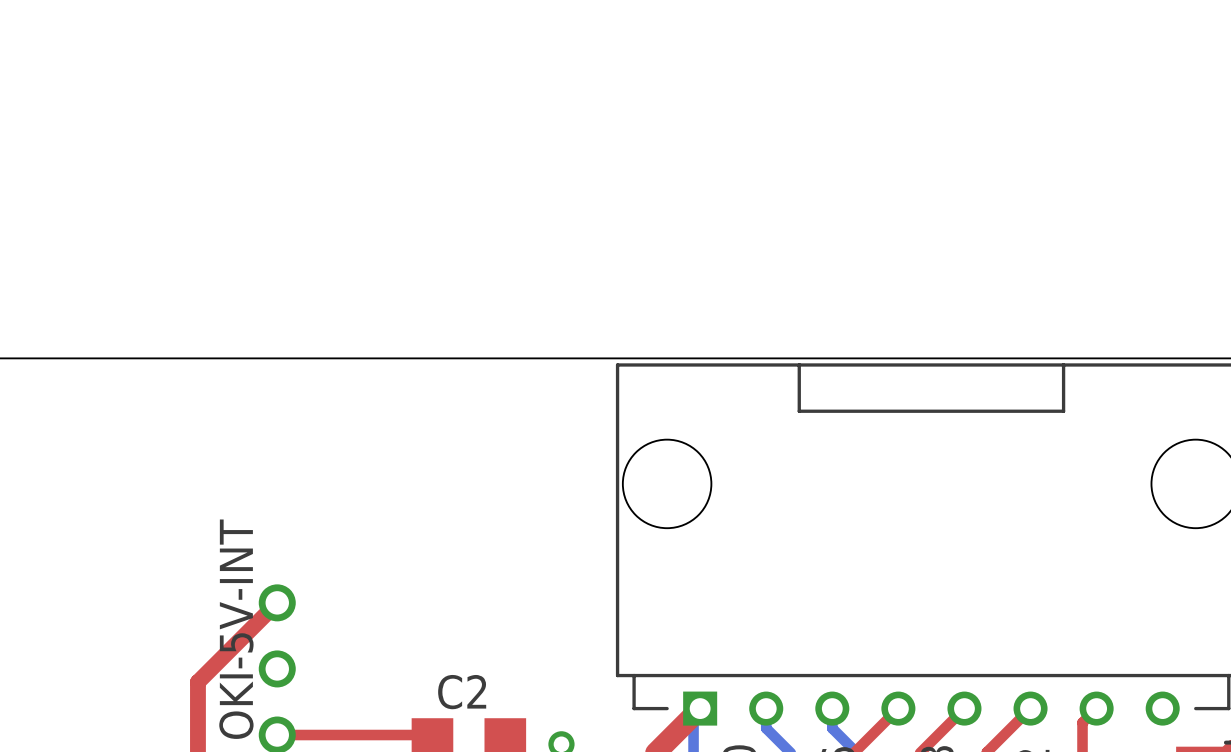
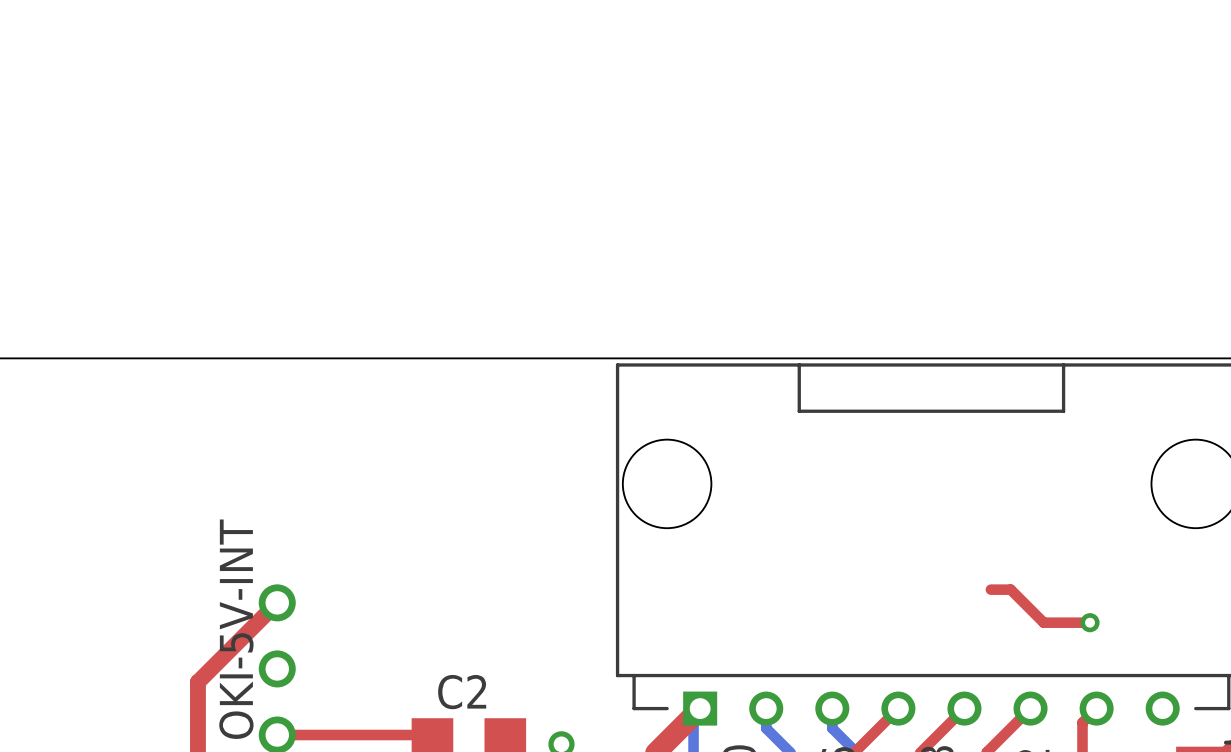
top track: none -> (990, 589) (1010, 589) (1043, 622) (1090, 622)
via: none -> (1090, 622)

